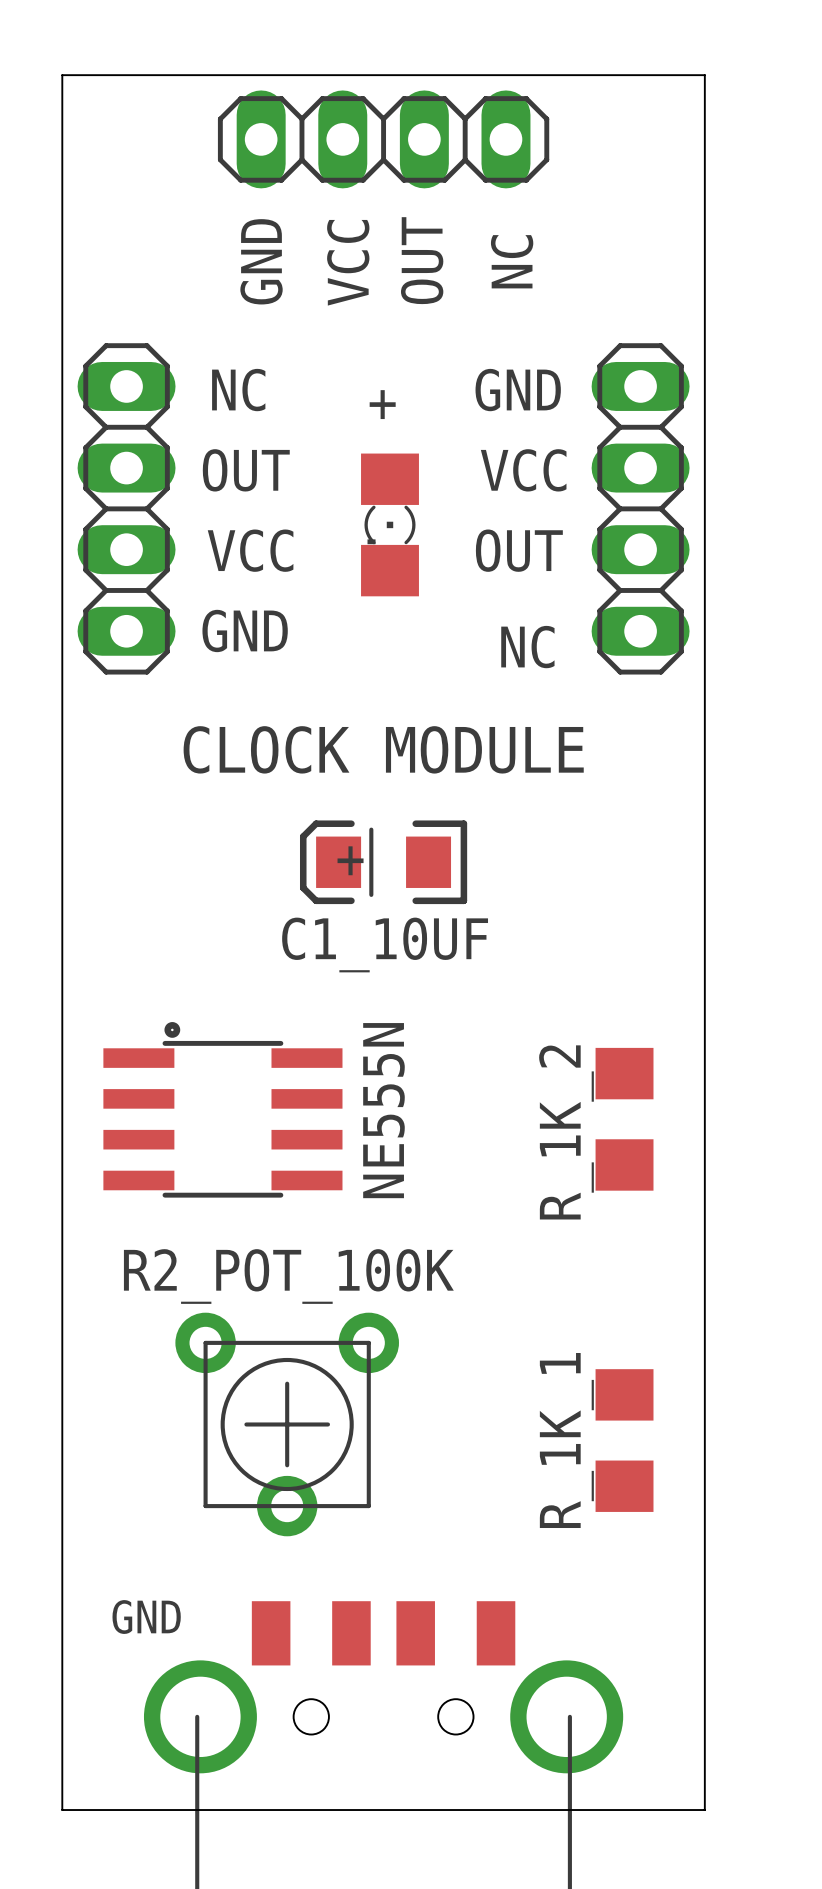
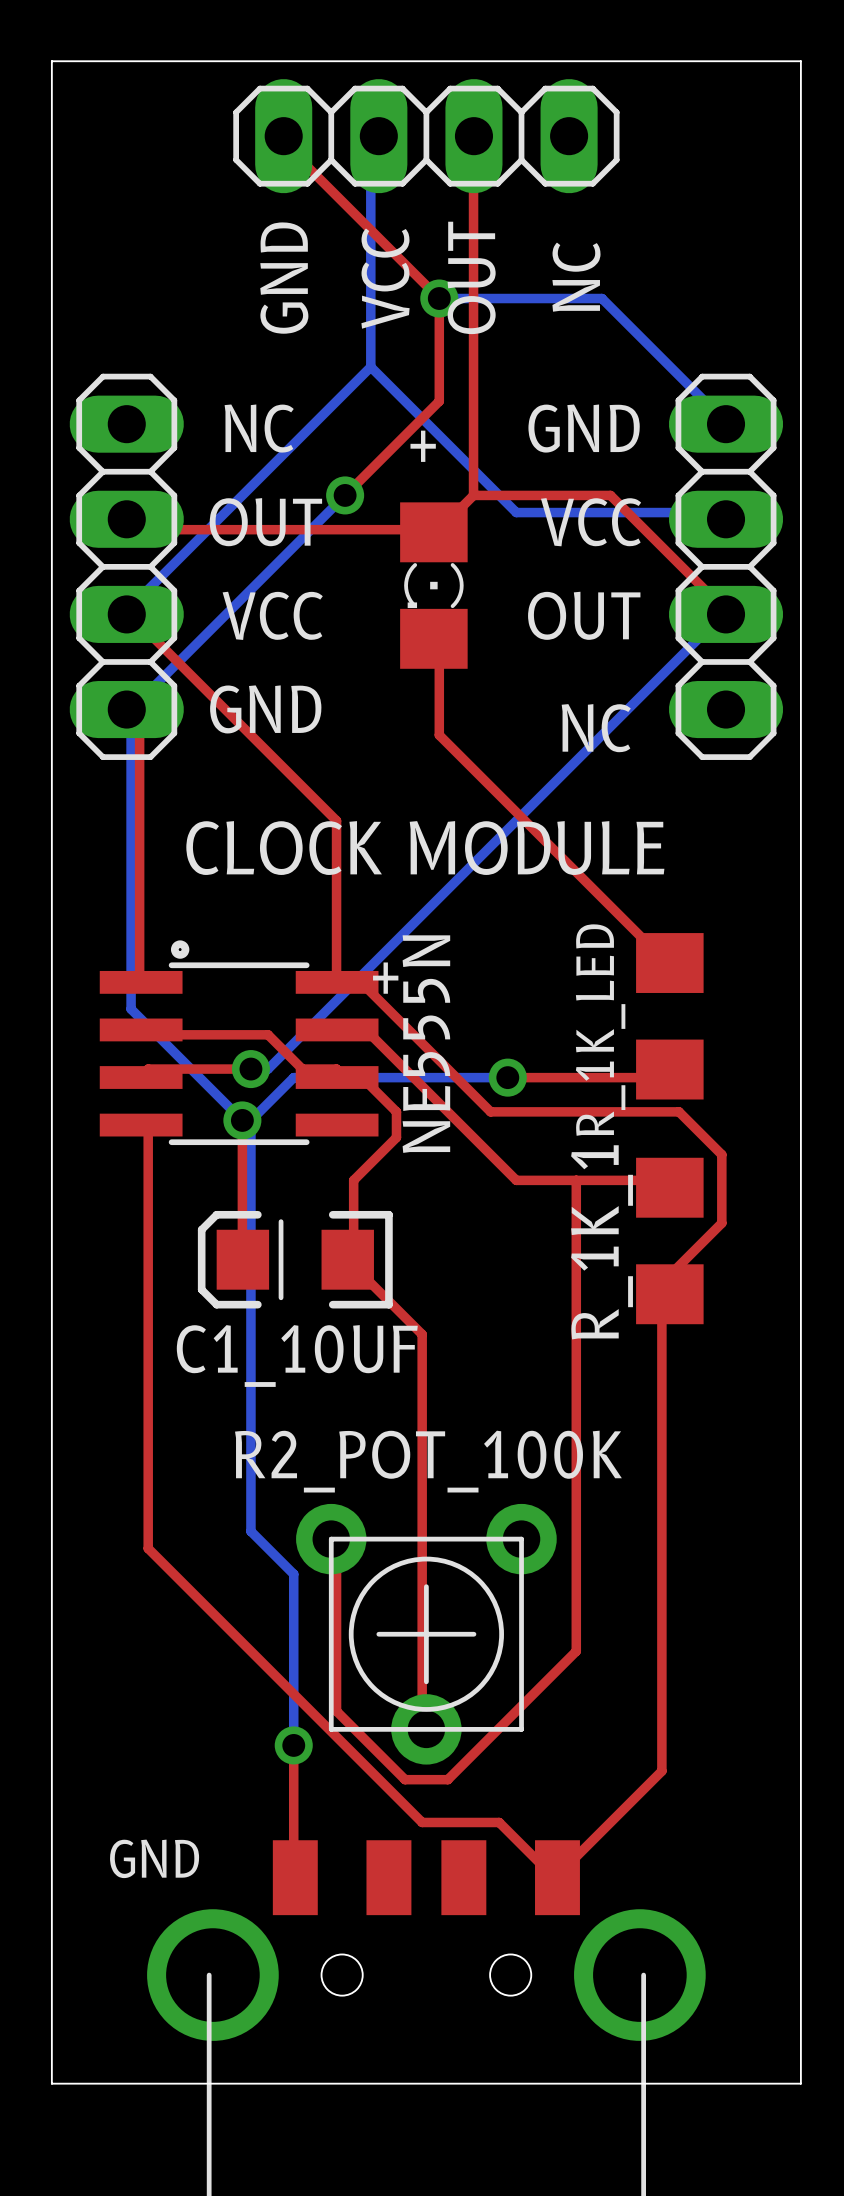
top track: none -> (283, 136) (285, 144) (439, 298) (439, 401) (345, 495)
bottom track: none -> (378, 136) (370, 144) (370, 367)
top track: none -> (473, 136) (473, 495)
bottom track: none -> (439, 298) (601, 298) (726, 424)
via: none -> (439, 298)
bottom track: none -> (370, 367) (131, 606) (126, 614)
bottom track: none -> (370, 367) (516, 512) (721, 512) (726, 519)
bottom track: none -> (345, 495) (131, 709) (126, 709) (131, 718) (131, 1009) (242, 1120) (250, 1120)
via: none -> (345, 495)
top track: none -> (473, 495) (439, 529) (433, 532) (430, 529) (139, 529) (126, 519)
top track: none -> (473, 495) (610, 495) (721, 606) (726, 614)
top track: none -> (126, 614) (131, 615) (336, 820) (337, 982) (362, 983) (490, 1111) (679, 1111) (721, 1154) (721, 1223) (670, 1274) (669, 1294) (661, 1300) (661, 1771) (557, 1877) (550, 1873) (499, 1822) (422, 1822) (148, 1548) (148, 1128) (141, 1125)
bottom track: none -> (726, 614) (721, 615) (268, 1069) (250, 1069)
top track: none -> (433, 638) (439, 640) (439, 735) (661, 957) (669, 963)
top track: none -> (126, 709) (131, 718) (139, 726) (141, 982)
C1_10UF position: (383, 862) -> (295, 1259)
R_1K_LED: none -> (669, 1016)
top track: none -> (141, 1029) (148, 1034) (268, 1034) (302, 1069) (336, 1069) (337, 1077) (362, 1077) (396, 1111) (396, 1137) (353, 1180) (353, 1257) (347, 1259) (422, 1334) (422, 1728) (426, 1729)
top track: none -> (337, 1029) (345, 1034) (370, 1034) (516, 1180) (661, 1180) (669, 1187)
top track: none -> (250, 1069) (148, 1069) (141, 1077)
via: none -> (250, 1069)
top track: none -> (669, 1069) (661, 1077) (507, 1077)
bottom track: none -> (507, 1077) (293, 1077) (250, 1120)
via: none -> (507, 1077)
top track: none -> (242, 1120) (242, 1259)
via: none -> (242, 1120)
bottom track: none -> (250, 1120) (250, 1531) (293, 1574) (293, 1745)
top track: none -> (576, 1180) (576, 1651) (447, 1779) (405, 1779) (336, 1711) (336, 1539) (331, 1539)
NE555N position: (222, 1109) -> (239, 1042)
R_1K_2: (624, 1119) -> none
R2_POT_100K position: (287, 1424) -> (426, 1634)
R_1K_1 position: (624, 1440) -> (669, 1240)
top track: none -> (293, 1745) (293, 1873) (295, 1877)
via: none -> (293, 1745)

